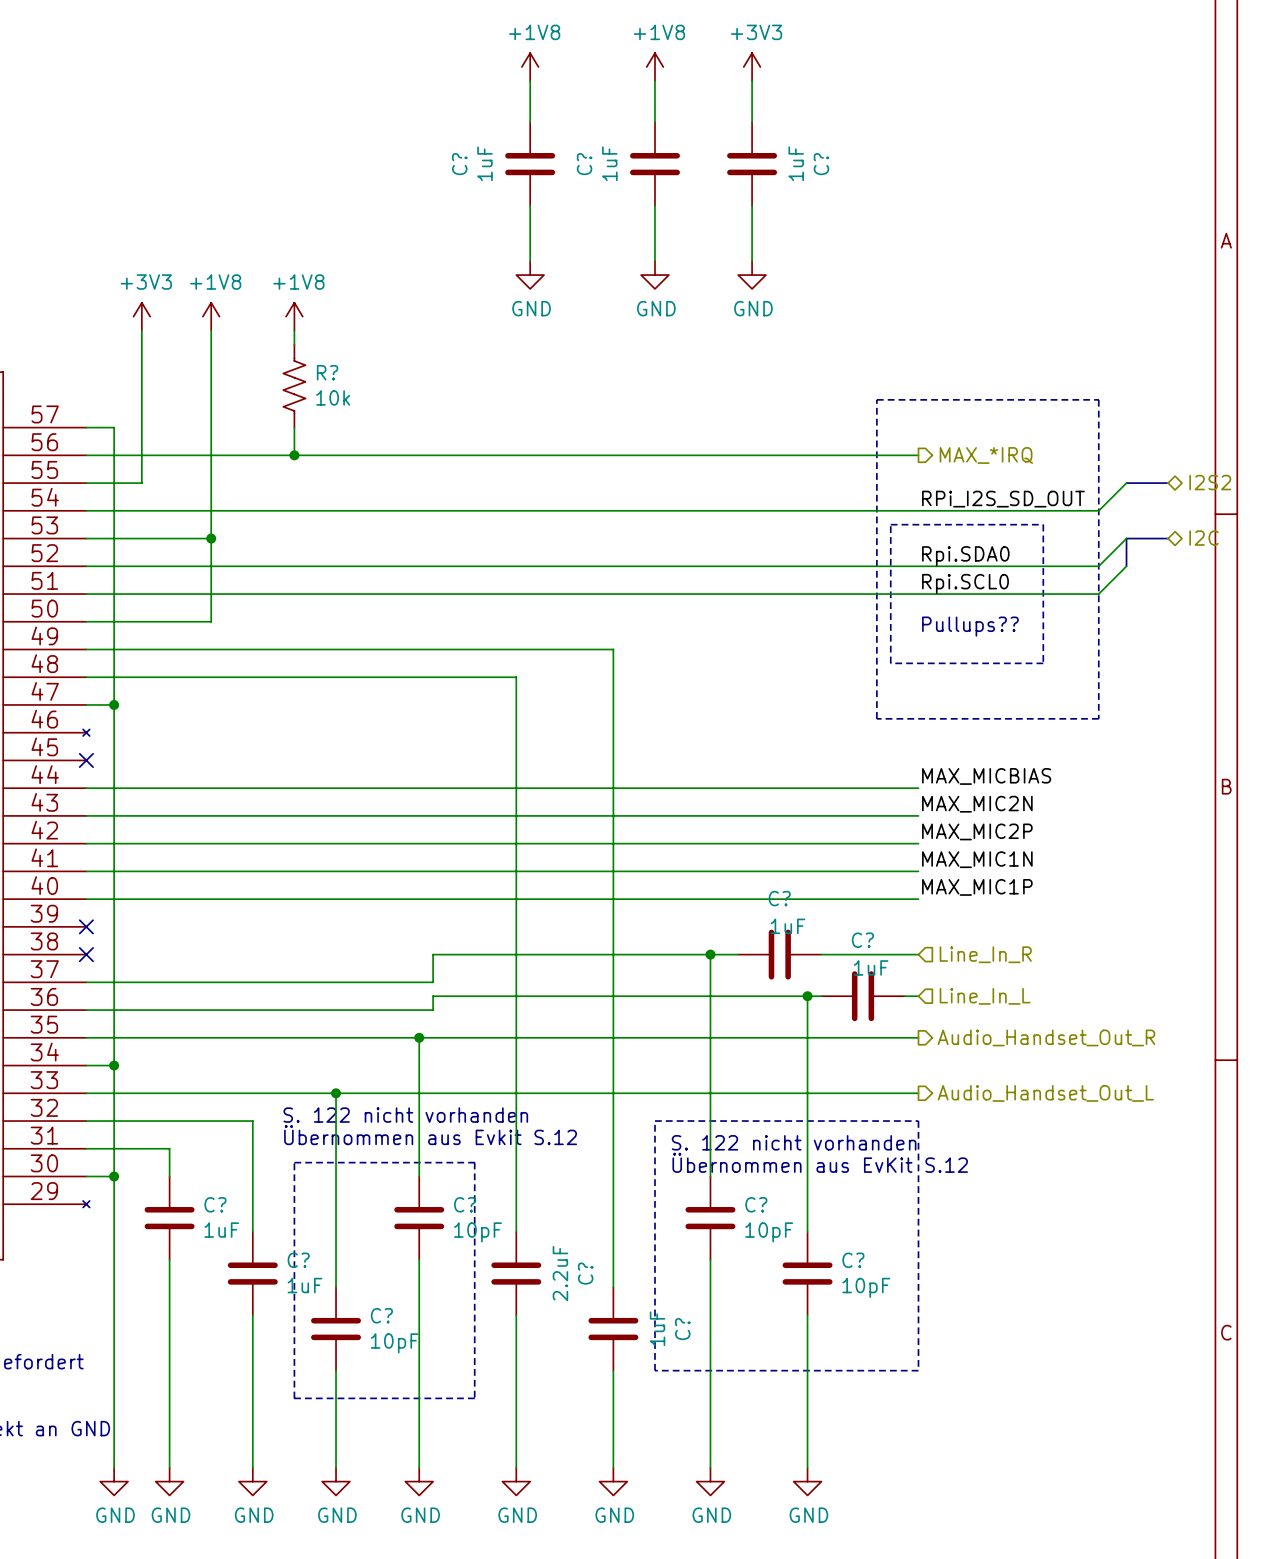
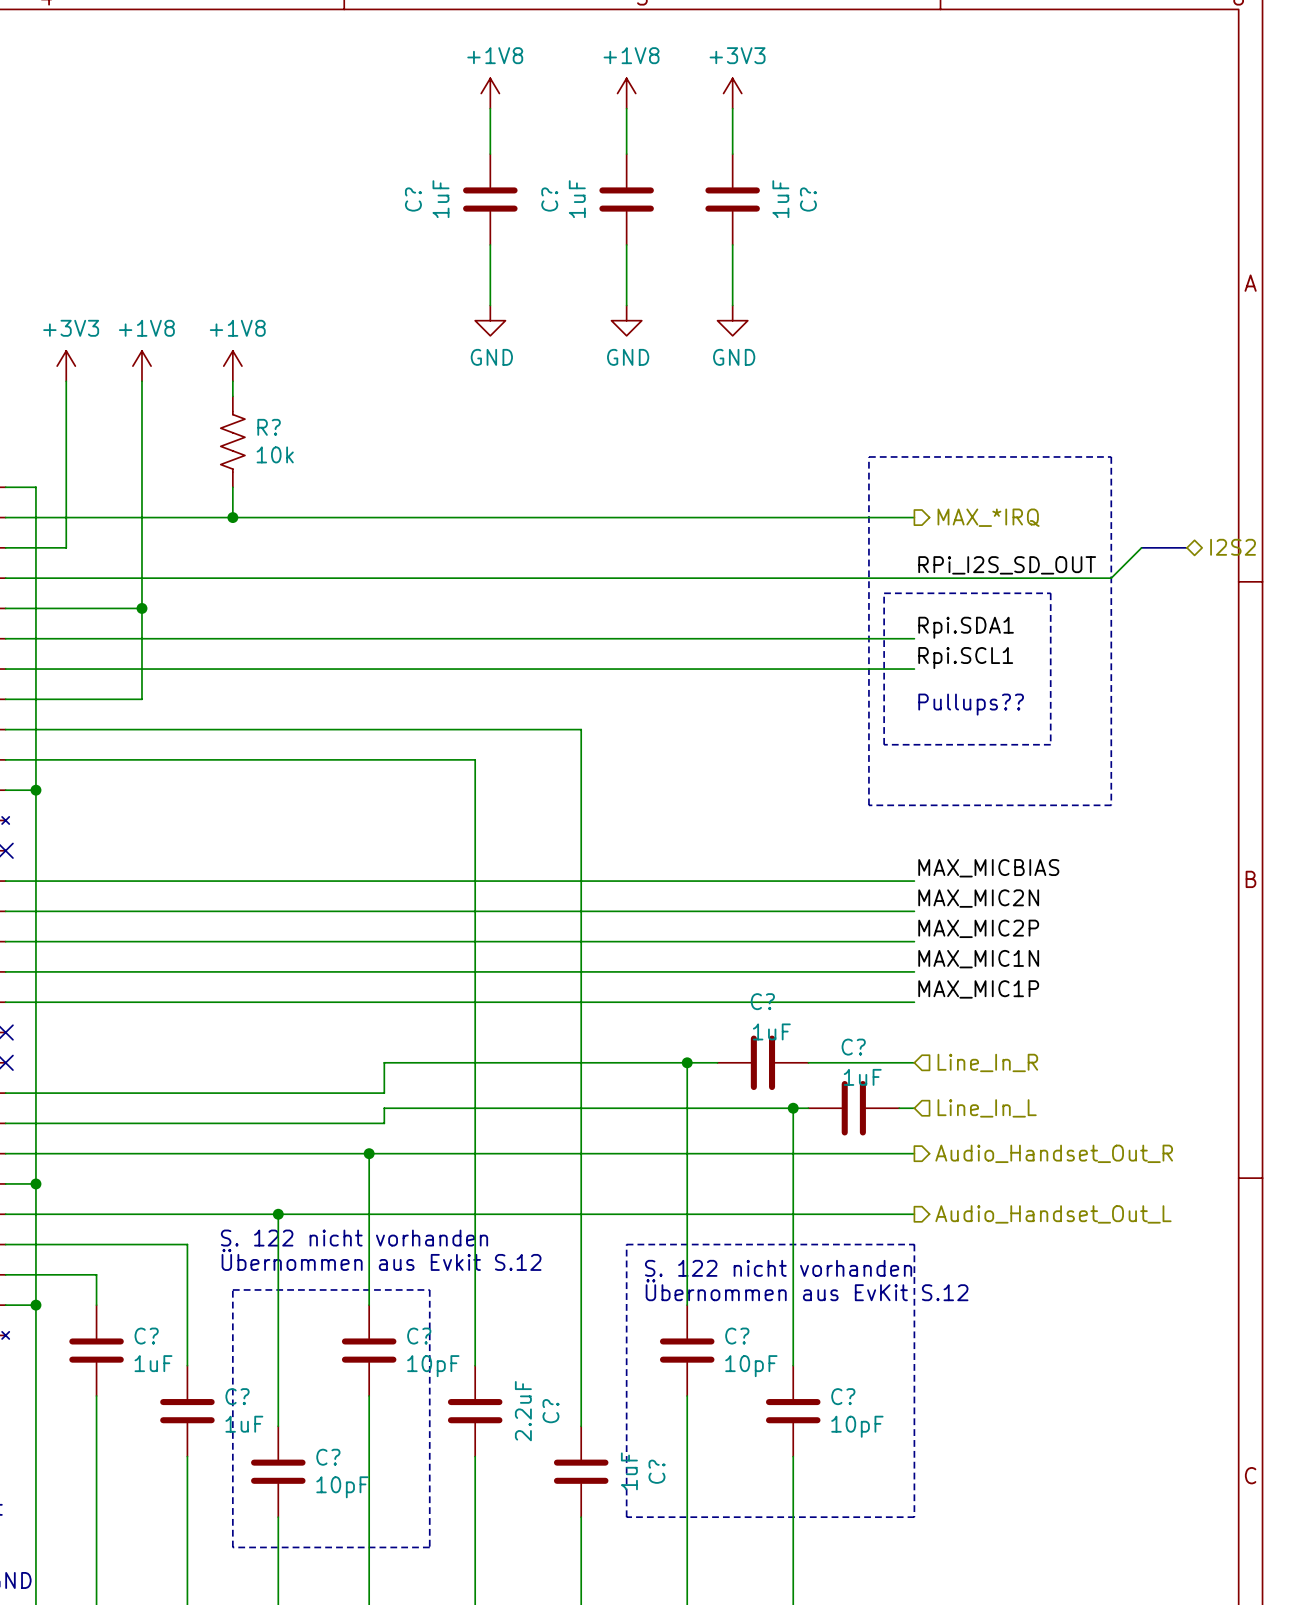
wire: (1126, 538) (1098, 566) (918, 566) -> none
bus: (1168, 538) (1126, 538) (1126, 566) -> none
hierarchical label: I2C (1204, 538) -> none
label: Rpi.SDA0 (965, 556) -> Rpi.SDA1 (966, 627)
wire: (1126, 566) (1098, 594) (918, 594) -> none
label: Rpi.SCL0 (965, 583) -> Rpi.SCL1 (965, 658)

